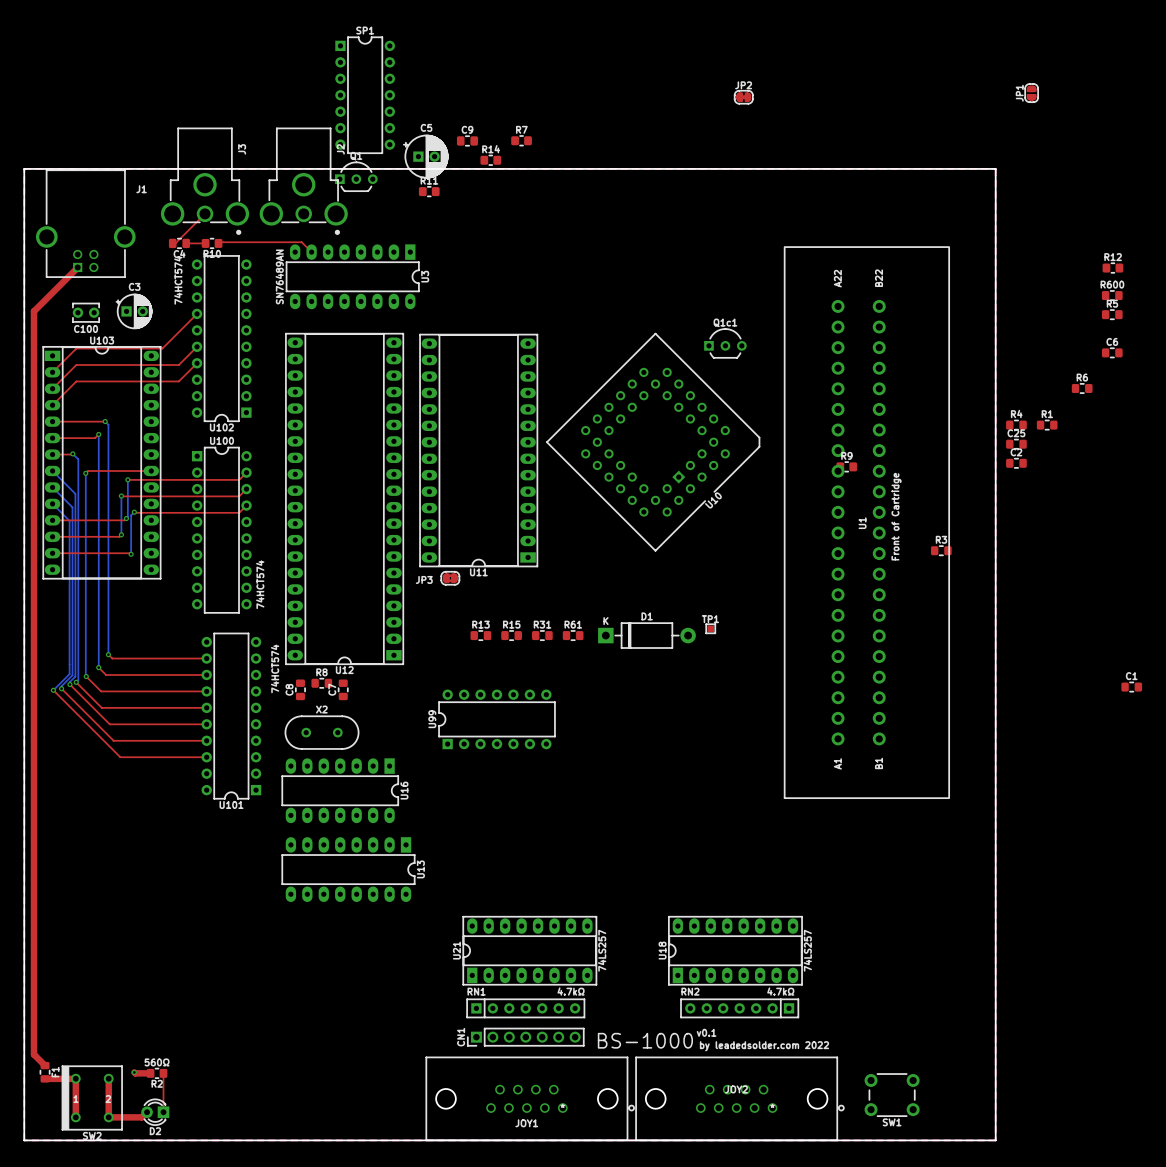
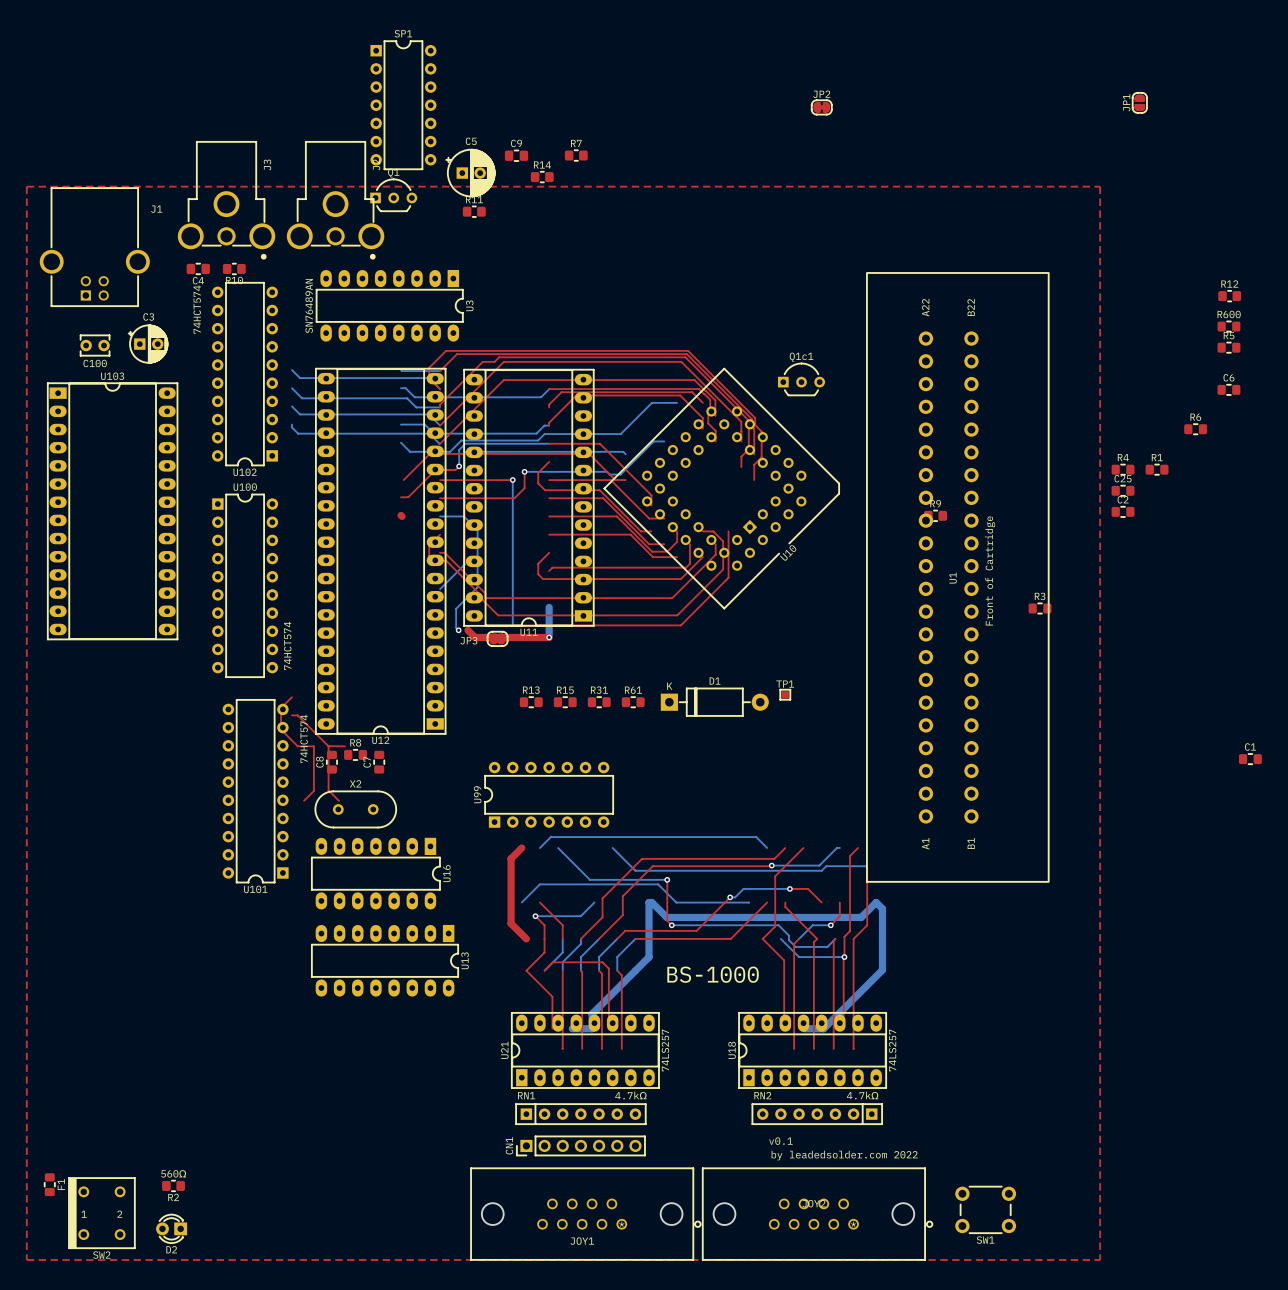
board edge: (24, 168) (995, 168) (995, 1140) (24, 1140) (24, 168) -> none
top track: (205, 213) (175, 243) (172, 243) -> none
top track: (186, 243) (205, 243) -> none
top track: (218, 243) (301, 242) (311, 252) -> none
top track: (77, 267) (33, 311) (33, 1054) (45, 1065) -> none
top track: (197, 313) (162, 348) (76, 348) (52, 372) -> none
bottom track: none -> (291, 370) (299, 378) (428, 378) (440, 389)
bottom track: none -> (401, 370) (440, 371)
top track: none -> (440, 371) (457, 354) (686, 354) (752, 419) (752, 426) (754, 428) (754, 454)
top track: (197, 346) (178, 365) (76, 365) (52, 388) -> none
bottom track: none -> (291, 388) (302, 398) (407, 398) (416, 407) (440, 407)
bottom track: none -> (401, 388) (405, 388) (414, 397) (541, 397) (549, 389)
top track: none -> (440, 389) (429, 378) (429, 367) (446, 350) (688, 350) (755, 418) (755, 425) (761, 431) (761, 457) (754, 464) (754, 480)
top track: none -> (549, 389) (698, 389) (710, 399) (708, 423) (715, 430) (715, 441)
top track: (197, 363) (178, 381) (76, 381) (52, 405) -> none
bottom track: none -> (677, 402) (651, 402) (620, 434) (544, 434) (538, 440) (461, 440) (450, 451) (410, 451) (401, 442)
top track: none -> (702, 402) (692, 392) (561, 392) (549, 404) (549, 407)
bottom track: none -> (291, 406) (299, 414) (428, 414) (440, 425)
top track: none -> (440, 407) (440, 404) (482, 361) (494, 361) (499, 357) (685, 357) (748, 420) (748, 449) (741, 456) (741, 467)
top track: none -> (715, 415) (715, 400) (694, 380) (503, 380) (440, 443)
bottom track: none -> (291, 424) (291, 427) (298, 433) (429, 433) (440, 443)
bottom track: none -> (401, 424) (424, 424) (433, 433) (536, 433) (544, 425) (549, 425)
top track: none -> (440, 425) (503, 361) (681, 361) (741, 421) (741, 431)
top track: none -> (549, 425) (549, 422) (576, 395) (680, 395) (702, 418) (702, 428)
top track: none -> (741, 431) (741, 441)
bottom track: none -> (664, 441) (653, 441) (620, 474) (609, 474) (607, 471) (524, 471)
top track: none -> (549, 443) (599, 443) (651, 495) (651, 505)
bottom track: none -> (549, 443) (465, 443) (459, 450) (459, 466)
bottom track: none -> (625, 454) (623, 451) (464, 451) (464, 504)
top track: none -> (549, 461) (538, 472) (538, 483) (545, 490) (599, 490) (640, 531) (651, 531)
top track: (105, 421) (52, 421) -> none
bottom track: (105, 421) (108, 424) (108, 654) -> none
via: (105, 421) -> none
top track: none -> (459, 466) (455, 469) (435, 469) (408, 497) (401, 497)
via: none -> (459, 466)
top track: none -> (524, 471) (524, 488) (514, 498) (440, 498)
via: none -> (524, 471)
top track: (98, 434) (95, 438) (52, 438) -> none
bottom track: (98, 434) (98, 667) -> none
via: (98, 434) -> none
top track: none -> (403, 480) (429, 453) (589, 453) (615, 480) (625, 480)
top track: none -> (512, 480) (440, 480)
bottom track: none -> (512, 480) (512, 625)
via: none -> (512, 480)
top track: none -> (549, 480) (610, 480) (649, 518) (664, 518)
top track: none -> (549, 498) (603, 498) (649, 544) (664, 544)
top track: (72, 453) (52, 454) -> none
bottom track: (72, 453) (78, 459) (78, 680) (76, 682) -> none
via: (72, 453) -> none
top track: none -> (464, 504) (464, 562)
top track: none -> (401, 515) (402, 516)
bottom track: none -> (440, 516) (463, 516) (477, 530) (477, 587) (456, 608) (456, 627) (458, 630)
top track: none -> (549, 516) (616, 516) (652, 551) (667, 551) (677, 541) (677, 531)
bottom track: (52, 471) (75, 493) (75, 676) (69, 684) -> none
top track: (151, 471) (88, 471) (85, 473) -> none
top track: (246, 472) (239, 479) (127, 479) -> none
bottom track: (85, 473) (86, 676) -> none
via: (85, 473) -> none
bottom track: (127, 479) (126, 518) -> none
via: (127, 479) -> none
top track: none -> (702, 531) (713, 531) (723, 541) (723, 569) (677, 615) (498, 615) (446, 560) (433, 560) (429, 556) (429, 545) (440, 534)
top track: none -> (728, 531) (728, 577) (680, 625) (512, 625)
top track: none -> (549, 534) (630, 534) (653, 557) (677, 557)
bottom track: (52, 487) (72, 507) (72, 675) (61, 686) (61, 688) -> none
top track: (246, 489) (239, 496) (121, 496) -> none
top track: none -> (689, 544) (689, 563) (686, 567) (552, 567) (549, 570)
top track: none -> (715, 544) (715, 554) (672, 598) (485, 598) (485, 593) (444, 552) (440, 552)
bottom track: (121, 496) (121, 534) -> none
via: (121, 496) -> none
top track: none -> (549, 552) (538, 563) (538, 574) (542, 579) (680, 579) (702, 557)
bottom track: (52, 503) (69, 520) (69, 674) (53, 690) -> none
top track: (246, 505) (239, 512) (134, 512) -> none
bottom track: none -> (464, 562) (440, 589)
bottom track: (134, 512) (131, 515) (131, 554) -> none
via: (134, 512) -> none
top track: (126, 518) (124, 520) (52, 520) -> none
via: (126, 518) -> none
top track: (121, 534) (119, 536) (52, 536) -> none
via: (121, 534) -> none
bottom track: none -> (549, 607) (549, 637)
top track: (52, 553) (131, 554) -> none
via: (131, 554) -> none
via: none -> (458, 630)
top track: none -> (467, 630) (475, 637) (549, 637)
via: none -> (549, 637)
top track: none -> (291, 697) (281, 708) (281, 729) (297, 746) (313, 746) (313, 790) (304, 800)
top track: none -> (291, 715) (297, 715) (328, 746) (328, 790) (338, 800)
top track: (108, 654) (112, 658) (206, 658) -> none
via: (108, 654) -> none
top track: (98, 667) (106, 674) (206, 674) -> none
via: (98, 667) -> none
top track: none -> (328, 746) (344, 746)
top track: (86, 676) (101, 691) (206, 691) -> none
via: (86, 676) -> none
top track: (76, 682) (101, 707) (206, 707) -> none
via: (76, 682) -> none
top track: (69, 684) (109, 724) (206, 724) -> none
via: (69, 684) -> none
top track: (61, 688) (113, 740) (206, 740) -> none
via: (61, 688) -> none
top track: (53, 690) (120, 757) (206, 757) -> none
via: (53, 690) -> none
top track: none -> (521, 847) (511, 858) (511, 923) (526, 938)
bottom track: none -> (539, 847) (550, 837) (756, 837) (767, 847)
bottom track: none -> (558, 847) (590, 879) (667, 879)
bottom track: none -> (612, 847) (635, 870) (821, 870) (826, 866) (867, 866)
top track: none -> (785, 847) (774, 858) (642, 858) (602, 898) (602, 917) (580, 938)
top track: none -> (803, 847) (775, 876) (775, 926) (762, 938) (784, 960) (784, 1028)
bottom track: none -> (839, 847) (836, 847) (819, 865) (771, 865)
top track: none -> (858, 847) (849, 856) (849, 931) (844, 936) (843, 1028)
top track: none -> (771, 865) (652, 866) (622, 896) (622, 915) (599, 938)
via: none -> (771, 865)
top track: none -> (867, 866) (867, 925) (853, 938) (853, 1049)
top track: none -> (667, 879) (667, 920) (671, 925)
via: none -> (667, 879)
top track: none -> (789, 888) (808, 888) (821, 902)
bottom track: none -> (789, 888) (743, 888) (735, 897) (730, 897)
via: none -> (789, 888)
top track: none -> (730, 897) (696, 930) (625, 930) (617, 938)
via: none -> (730, 897)
bottom track: none -> (521, 902) (539, 884) (658, 884) (676, 902) (748, 902)
top track: none -> (539, 902) (562, 925) (562, 938)
bottom track: none -> (594, 902) (580, 916) (535, 916)
top track: none -> (767, 902) (730, 938) (635, 938)
top track: none -> (785, 902) (785, 907) (817, 938) (813, 942) (813, 1049)
top track: none -> (839, 902) (839, 916) (830, 925)
top track: none -> (535, 916) (544, 925) (544, 952) (526, 970) (552, 996) (552, 1028)
via: none -> (535, 916)
bottom track: none -> (671, 925) (778, 925) (788, 935) (788, 940) (795, 946) (827, 946) (835, 938)
via: none -> (671, 925)
bottom track: none -> (830, 925) (812, 925) (799, 938)
via: none -> (830, 925)
bottom track: none -> (562, 938) (562, 952) (544, 970)
bottom track: none -> (580, 938) (580, 943) (562, 962) (562, 970)
bottom track: none -> (599, 938) (580, 957) (580, 970)
bottom track: none -> (617, 938) (599, 957) (599, 970)
bottom track: none -> (635, 938) (617, 957) (617, 970)
bottom track: none -> (780, 938) (799, 957) (844, 957)
top track: none -> (799, 938) (794, 943) (794, 1049)
top track: none -> (835, 938) (833, 940) (833, 1049)
via: none -> (844, 957)
top track: none -> (544, 970) (552, 962) (602, 962) (608, 968) (608, 1025) (611, 1028)
top track: none -> (562, 970) (562, 1049)
top track: none -> (580, 970) (582, 1049)
top track: none -> (599, 970) (601, 973) (601, 1049)
top track: none -> (617, 970) (621, 975) (621, 1049)
bottom track: none -> (572, 1028) (592, 1028) (592, 1014) (649, 957) (649, 902) (651, 902) (666, 917) (861, 917) (876, 902) (882, 908) (882, 970) (823, 1028) (804, 1028)
text position: BS-1000 (645, 1040) -> BS-1000 (713, 974)
top track: (134, 1072) (150, 1073) -> none
via: (134, 1072) -> none
top track: (163, 1073) (163, 1112) -> none
top track: (45, 1078) (75, 1078) (75, 1117) -> none
top track: (108, 1078) (108, 1117) (141, 1117) (147, 1112) -> none

